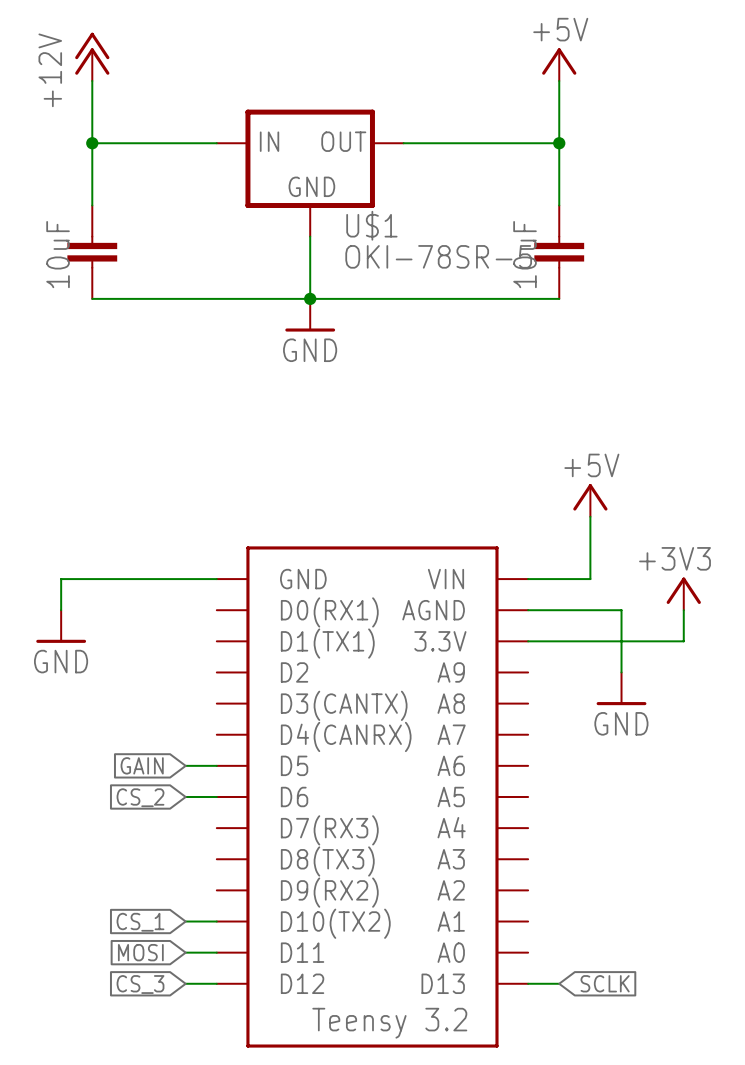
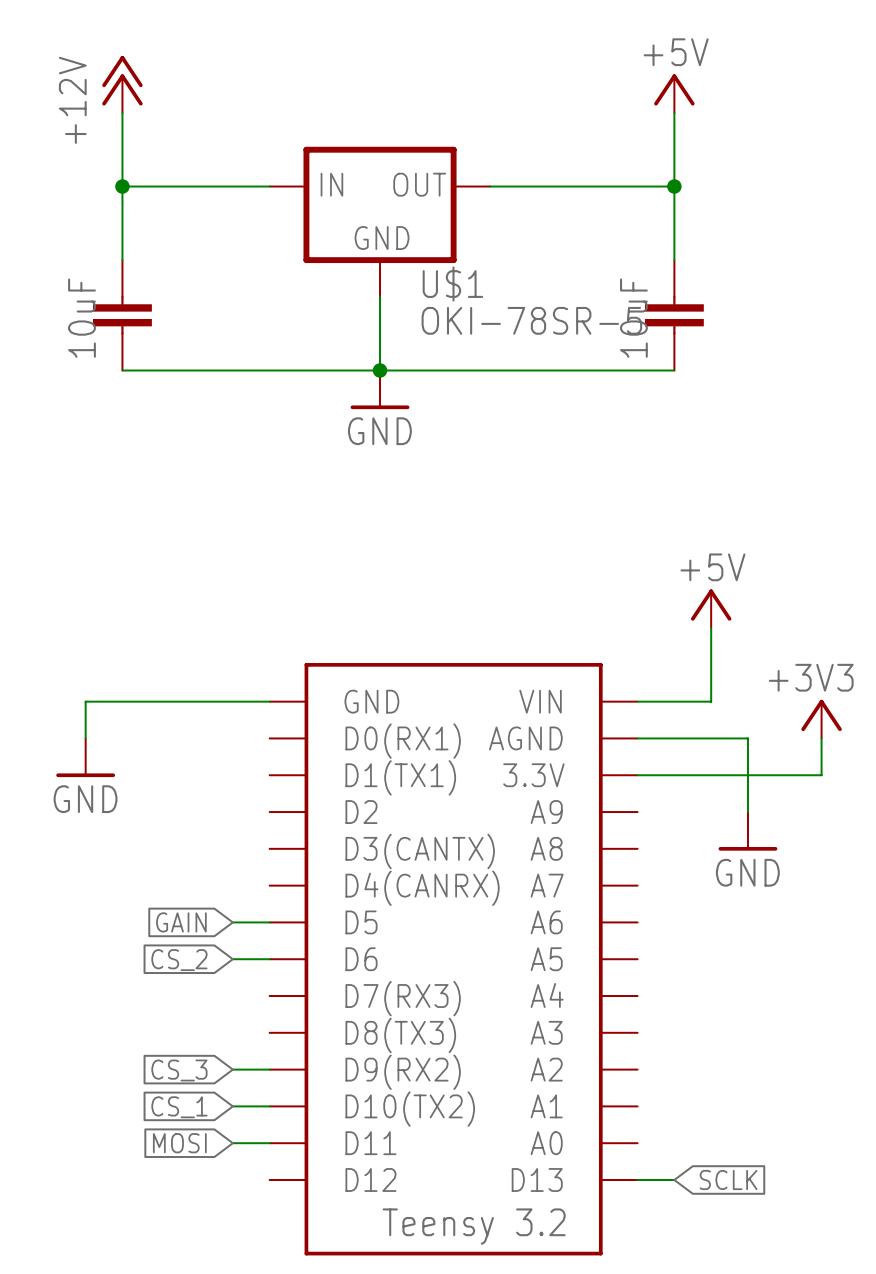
wire: (185, 983) (216, 983) -> (232, 1069) (269, 1069)
global label position: CS_3 (140, 984) -> CS_3 (179, 1070)

